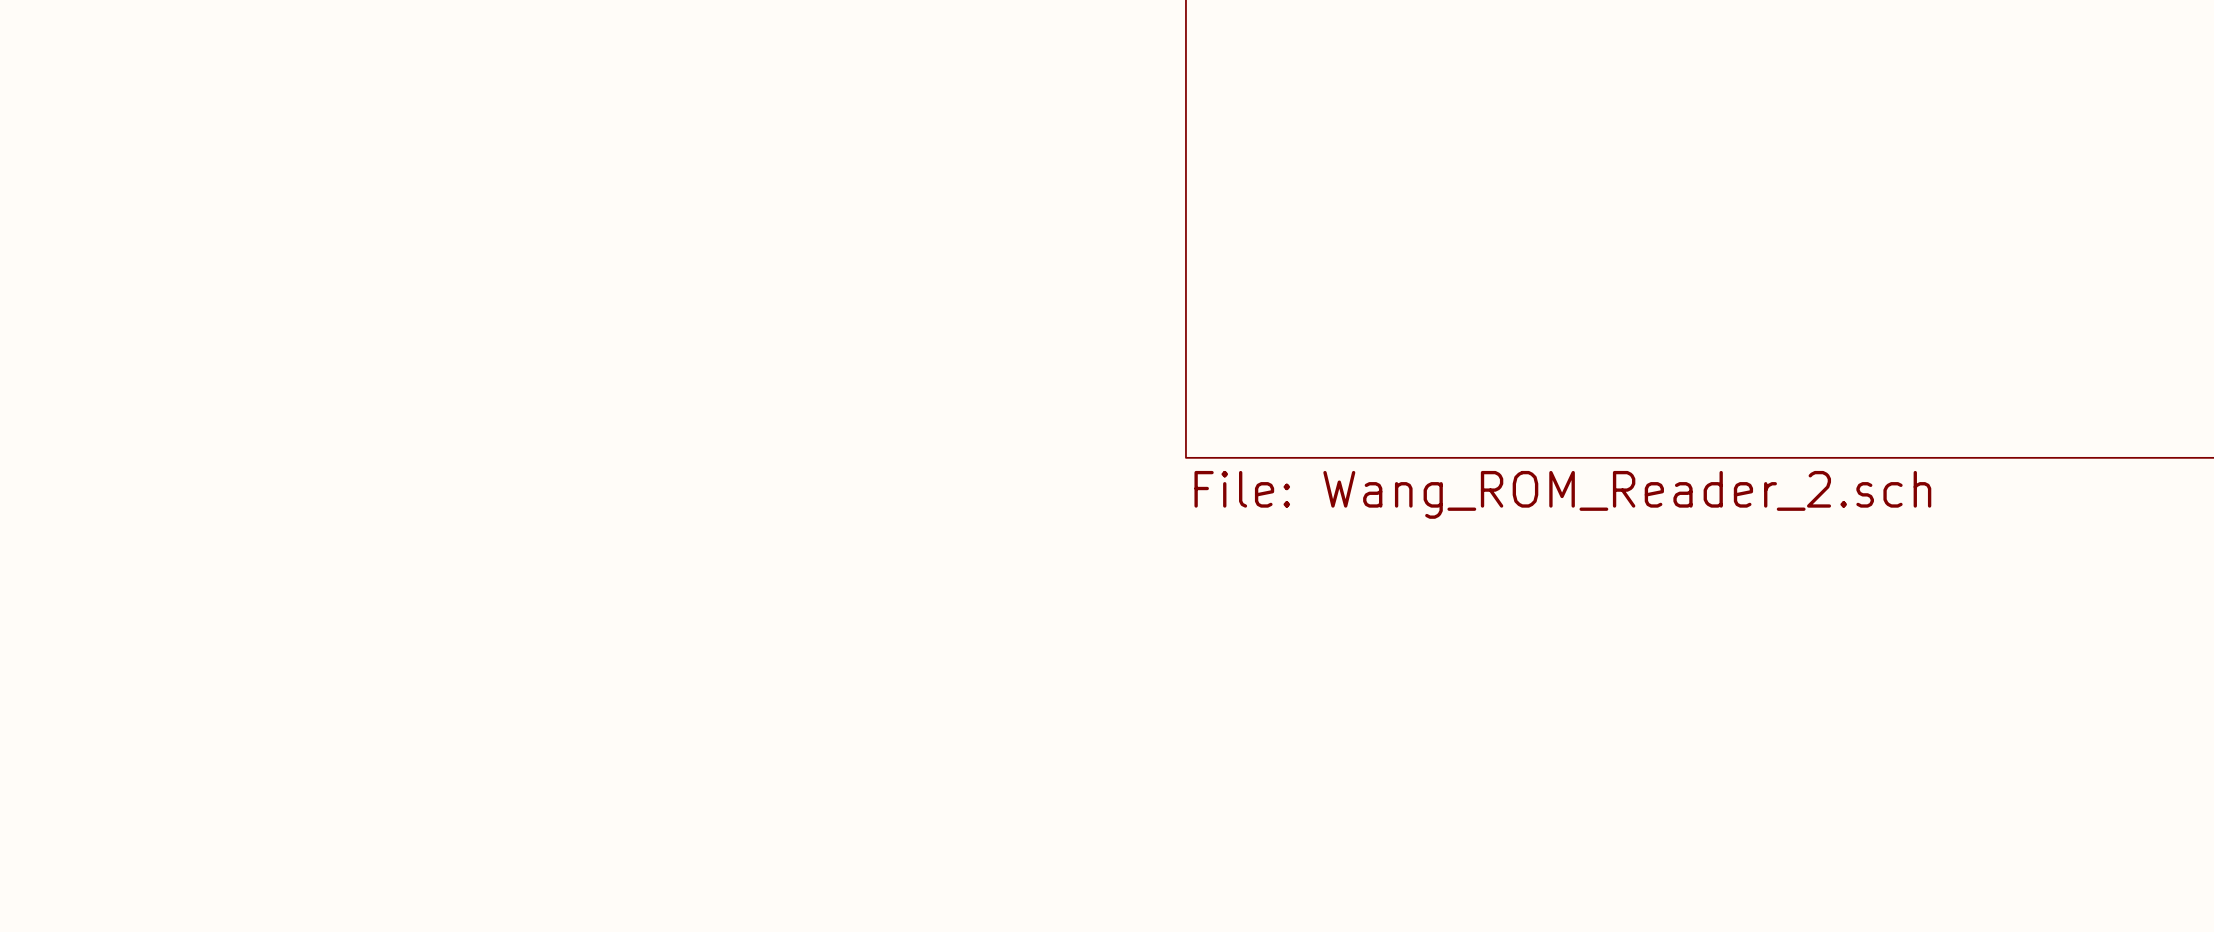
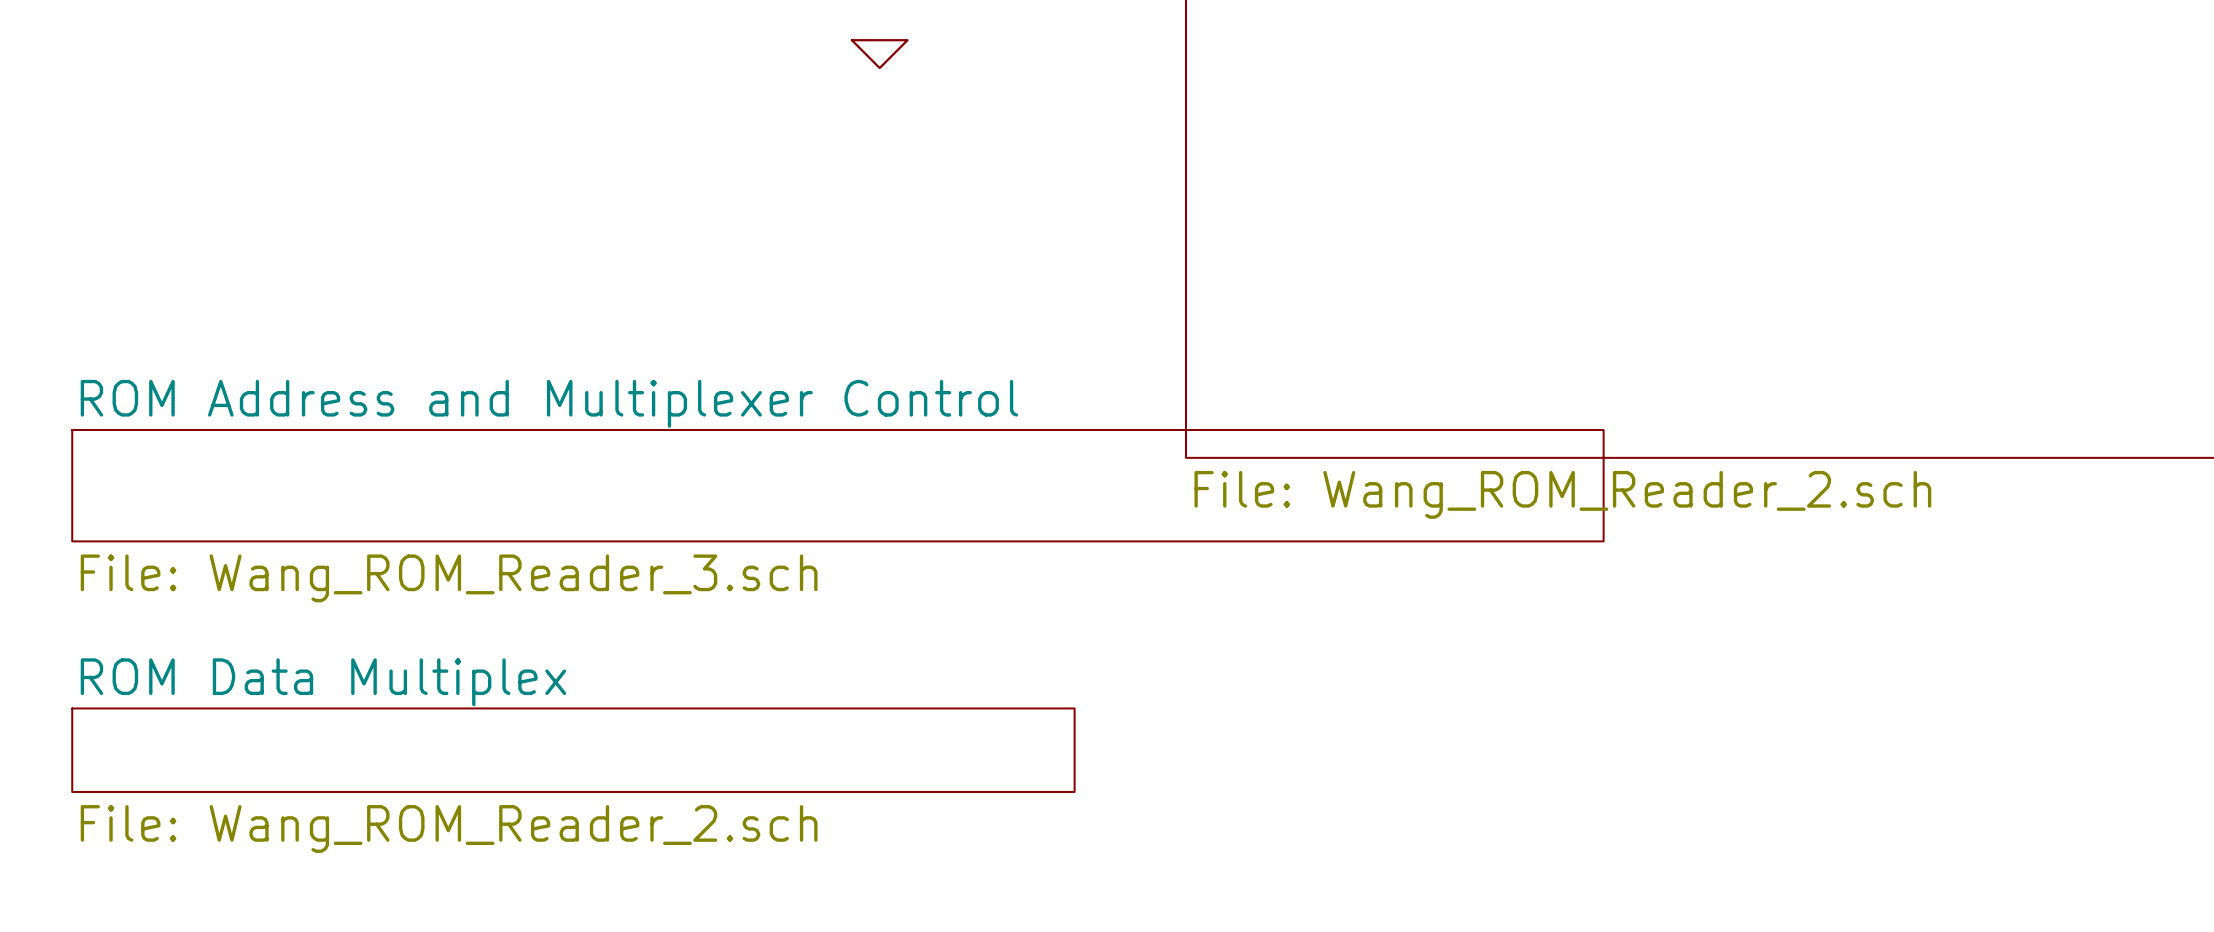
power symbol: none -> (879, 54)
sheet ROM Address and Multiplexer Control: none -> File: Wang_ROM_Reader_3.sch (837, 485)
sheet ROM Data Multiplex: none -> File: Wang_ROM_Reader_2.sch (573, 750)

